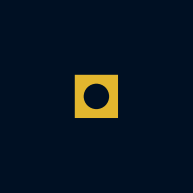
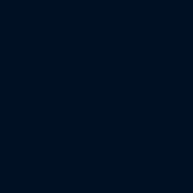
part: (96, 96) -> none

